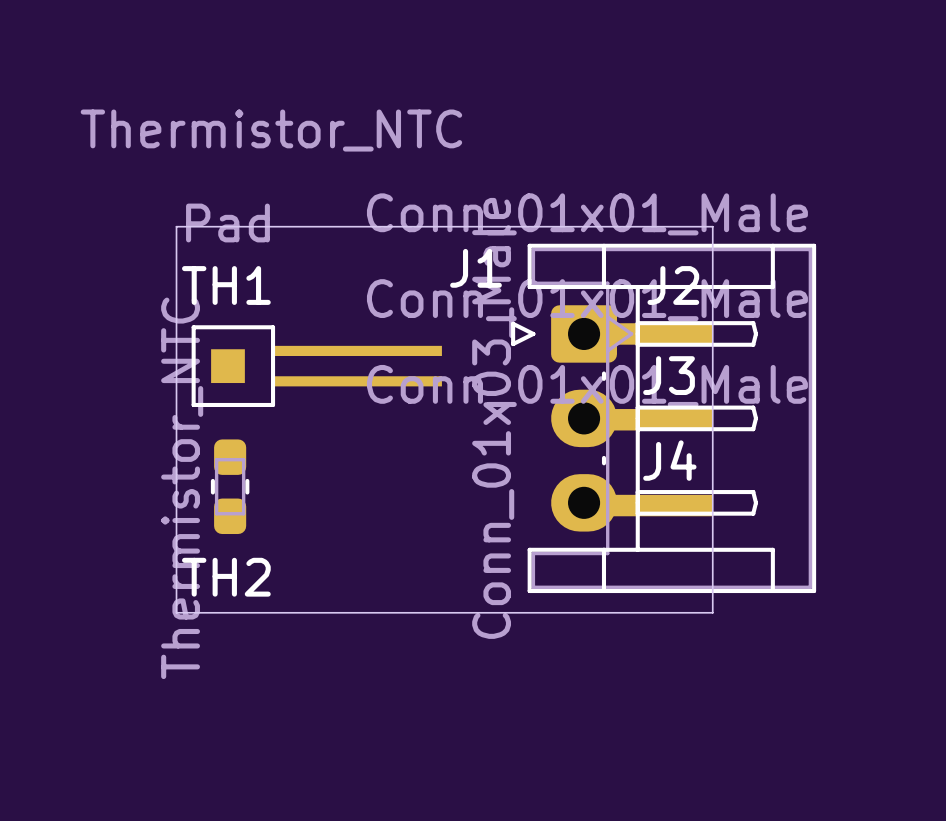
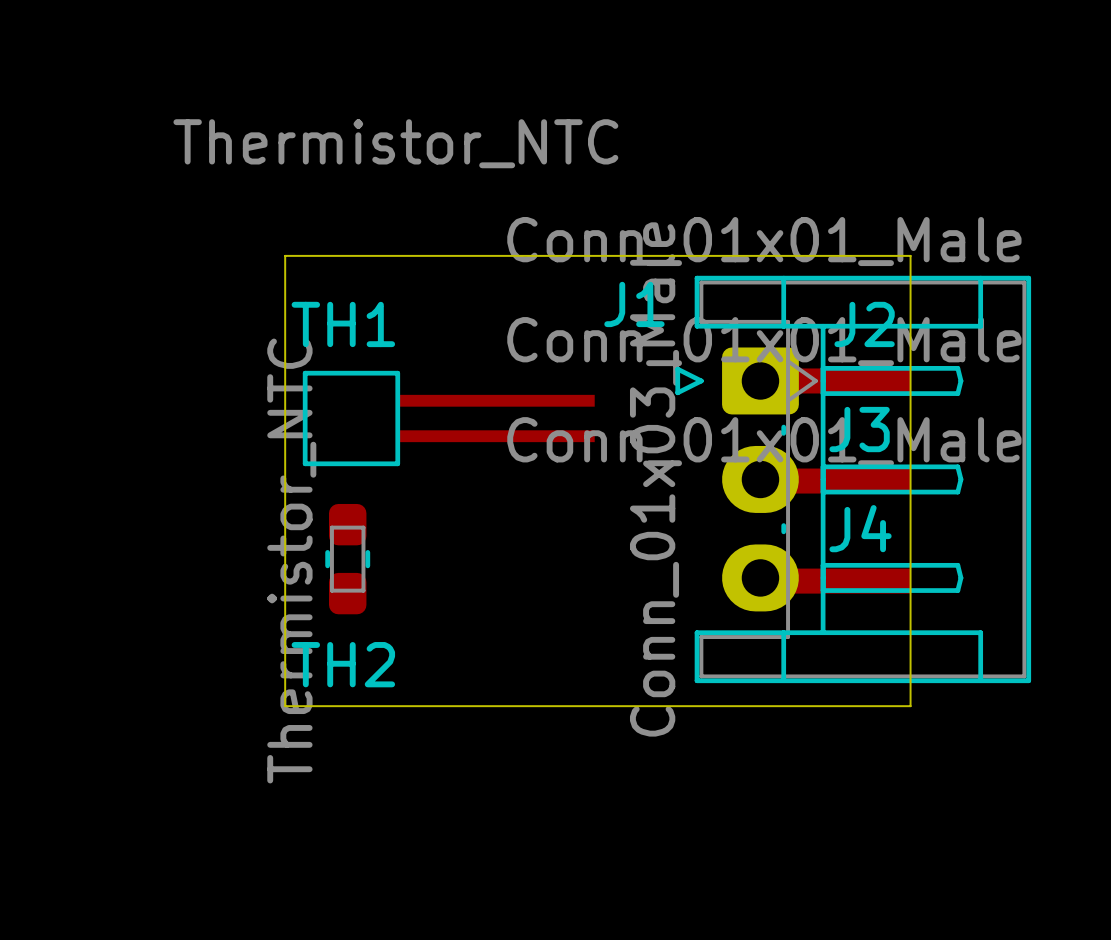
part: Pad (227, 366) -> none

